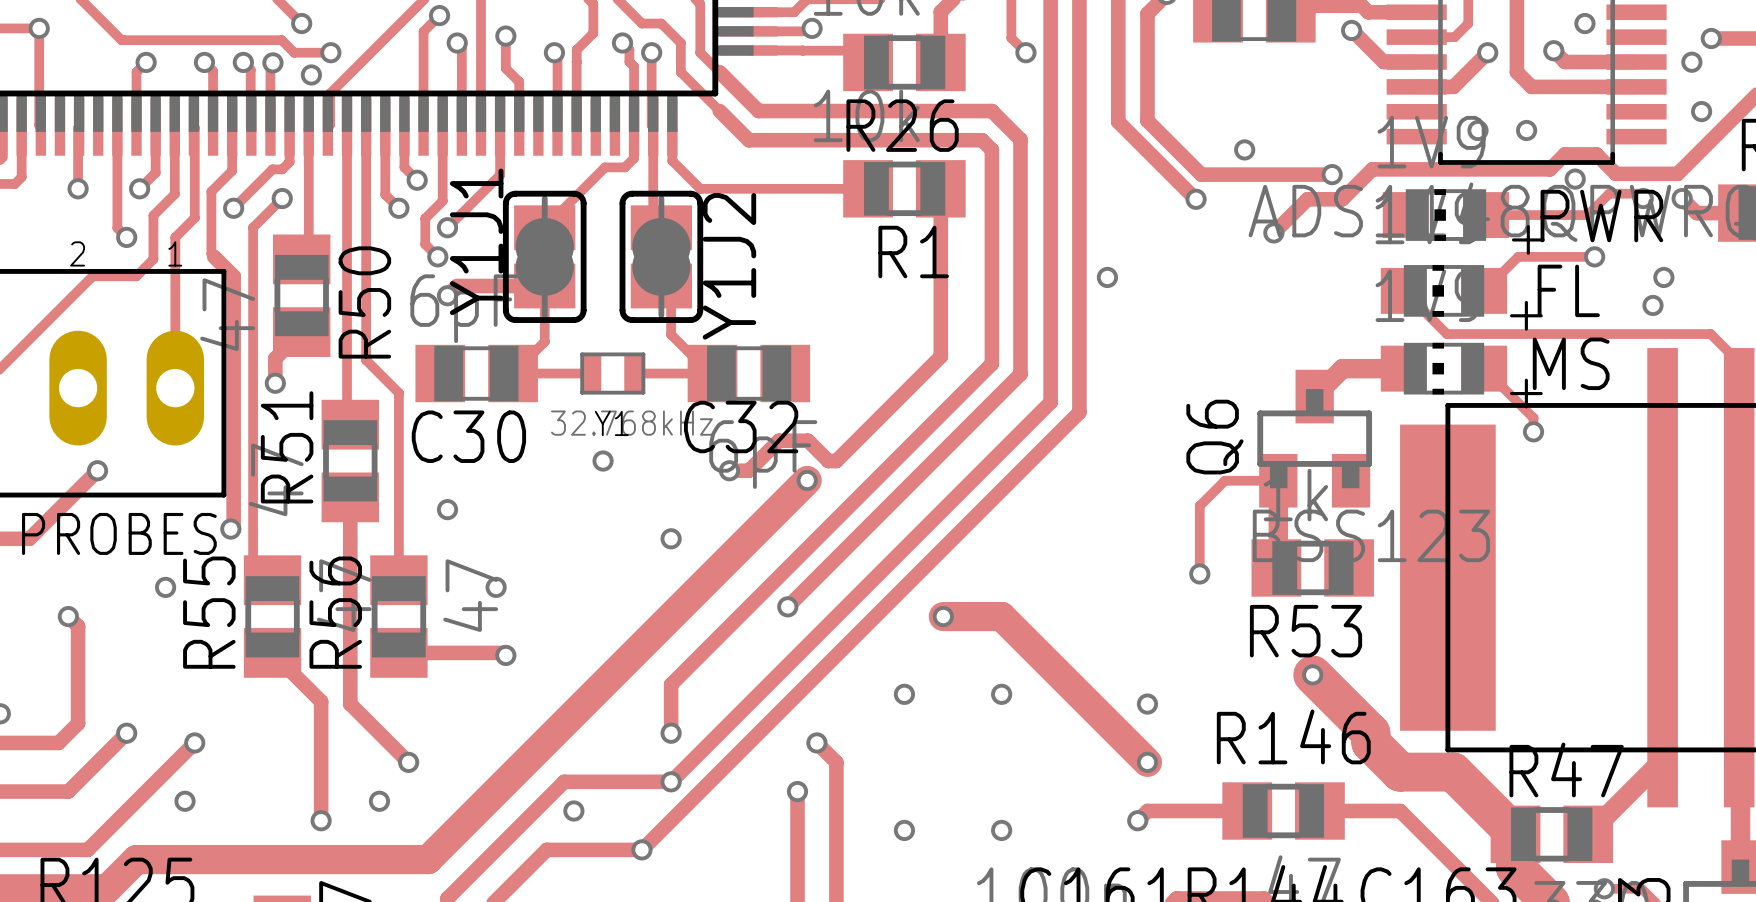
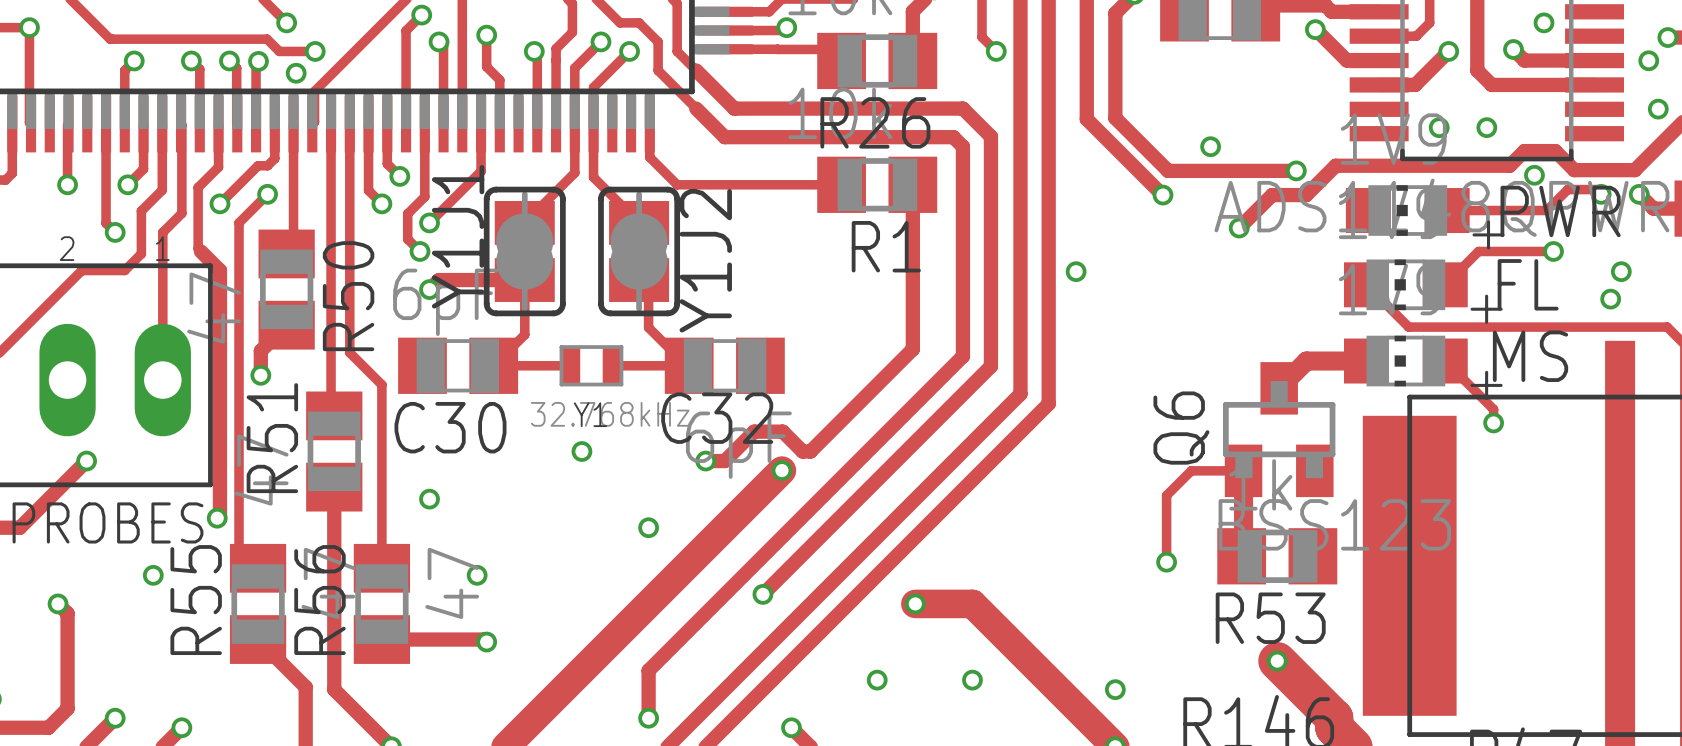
track: (622, 42) (629, 49) (629, 61) (634, 66) (634, 158) (624, 167) (605, 167) (595, 176) -> (600, 41) (574, 68) (574, 172)
track: (651, 52) (653, 219) -> (629, 51) (593, 87) (593, 177) (631, 214)

